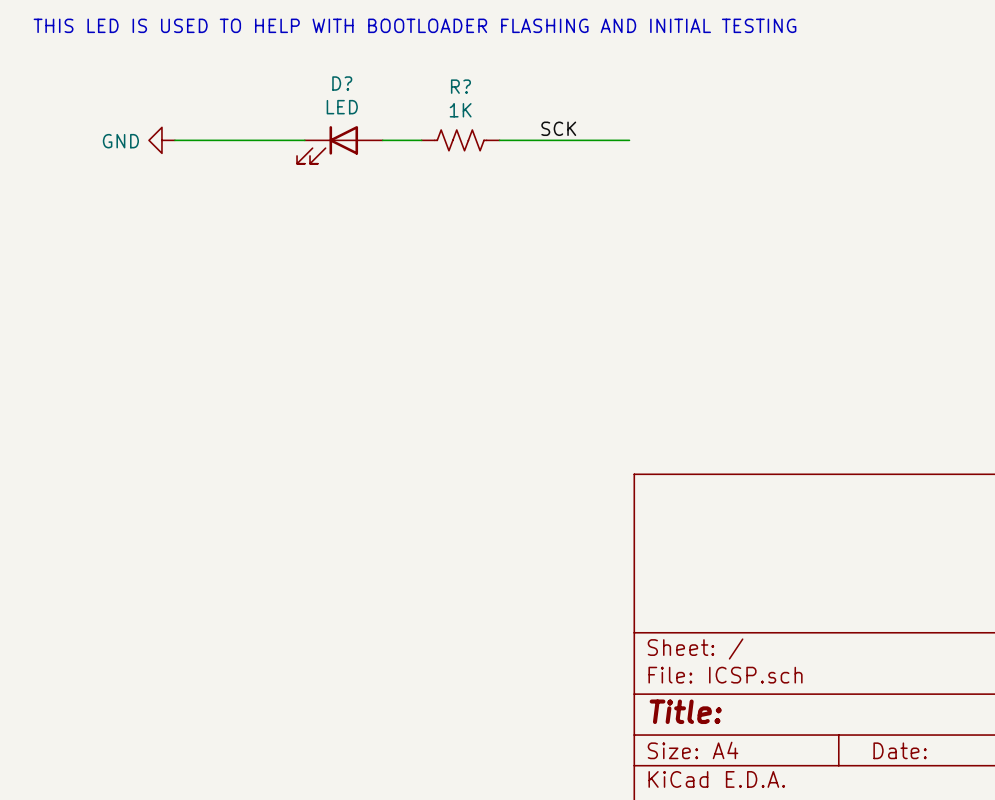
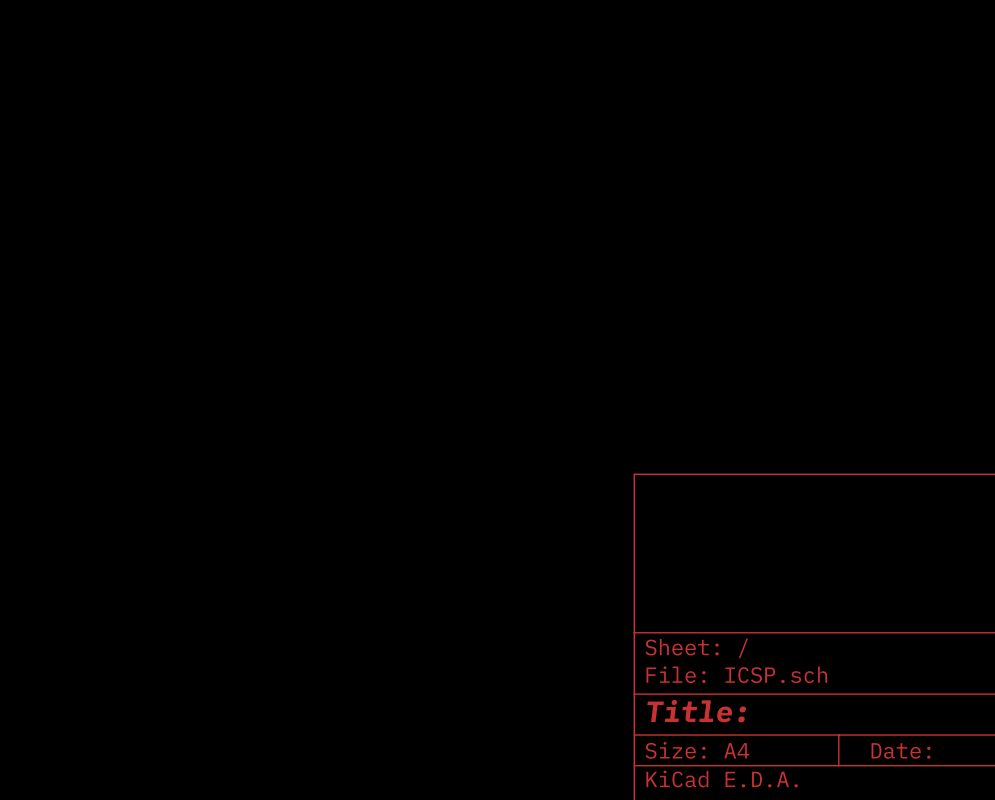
text: THIS LED IS USED TO HELP WITH BOOTLOADER FLASHING AND INITIAL TESTING (414, 25) -> none
label: SCK (558, 128) -> none
power symbol: GND (161, 140) -> none
wire: (174, 140) (304, 140) -> none
wire: (382, 140) (421, 140) -> none
R?: 1K (460, 140) -> none
wire: (499, 140) (629, 140) -> none
D?: LED (339, 144) -> none

